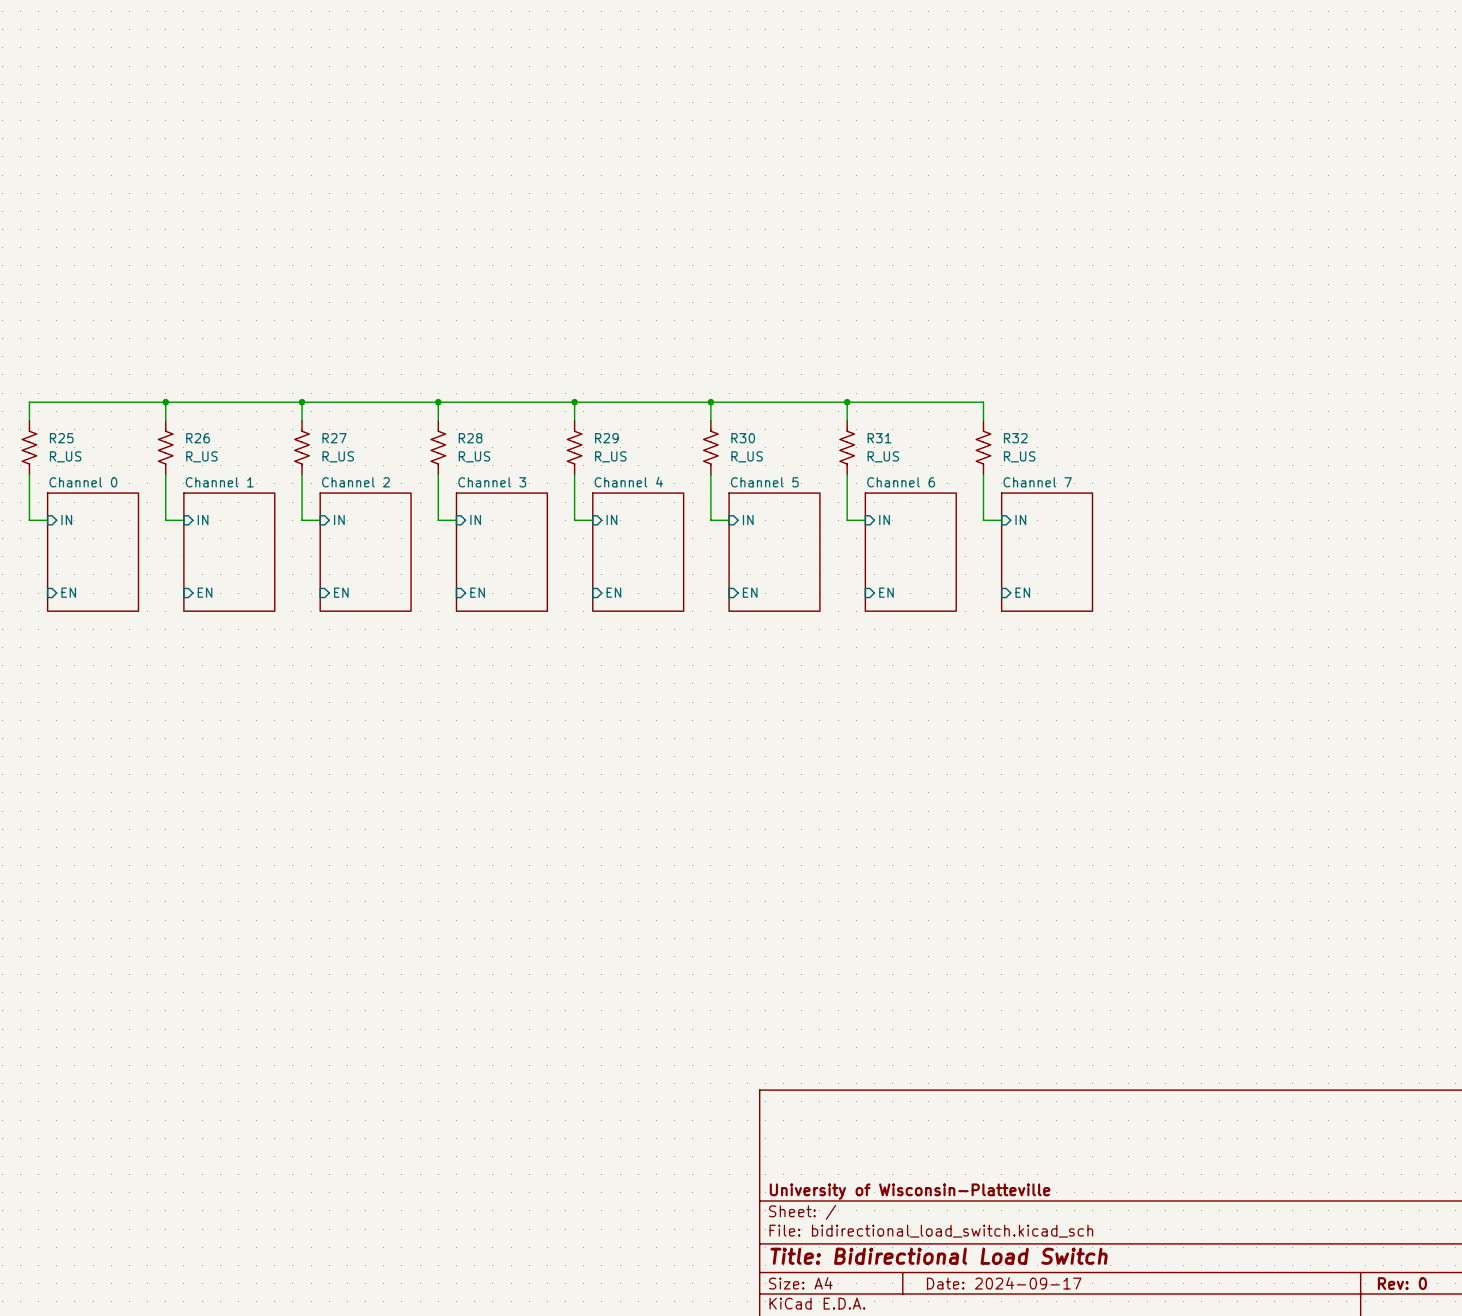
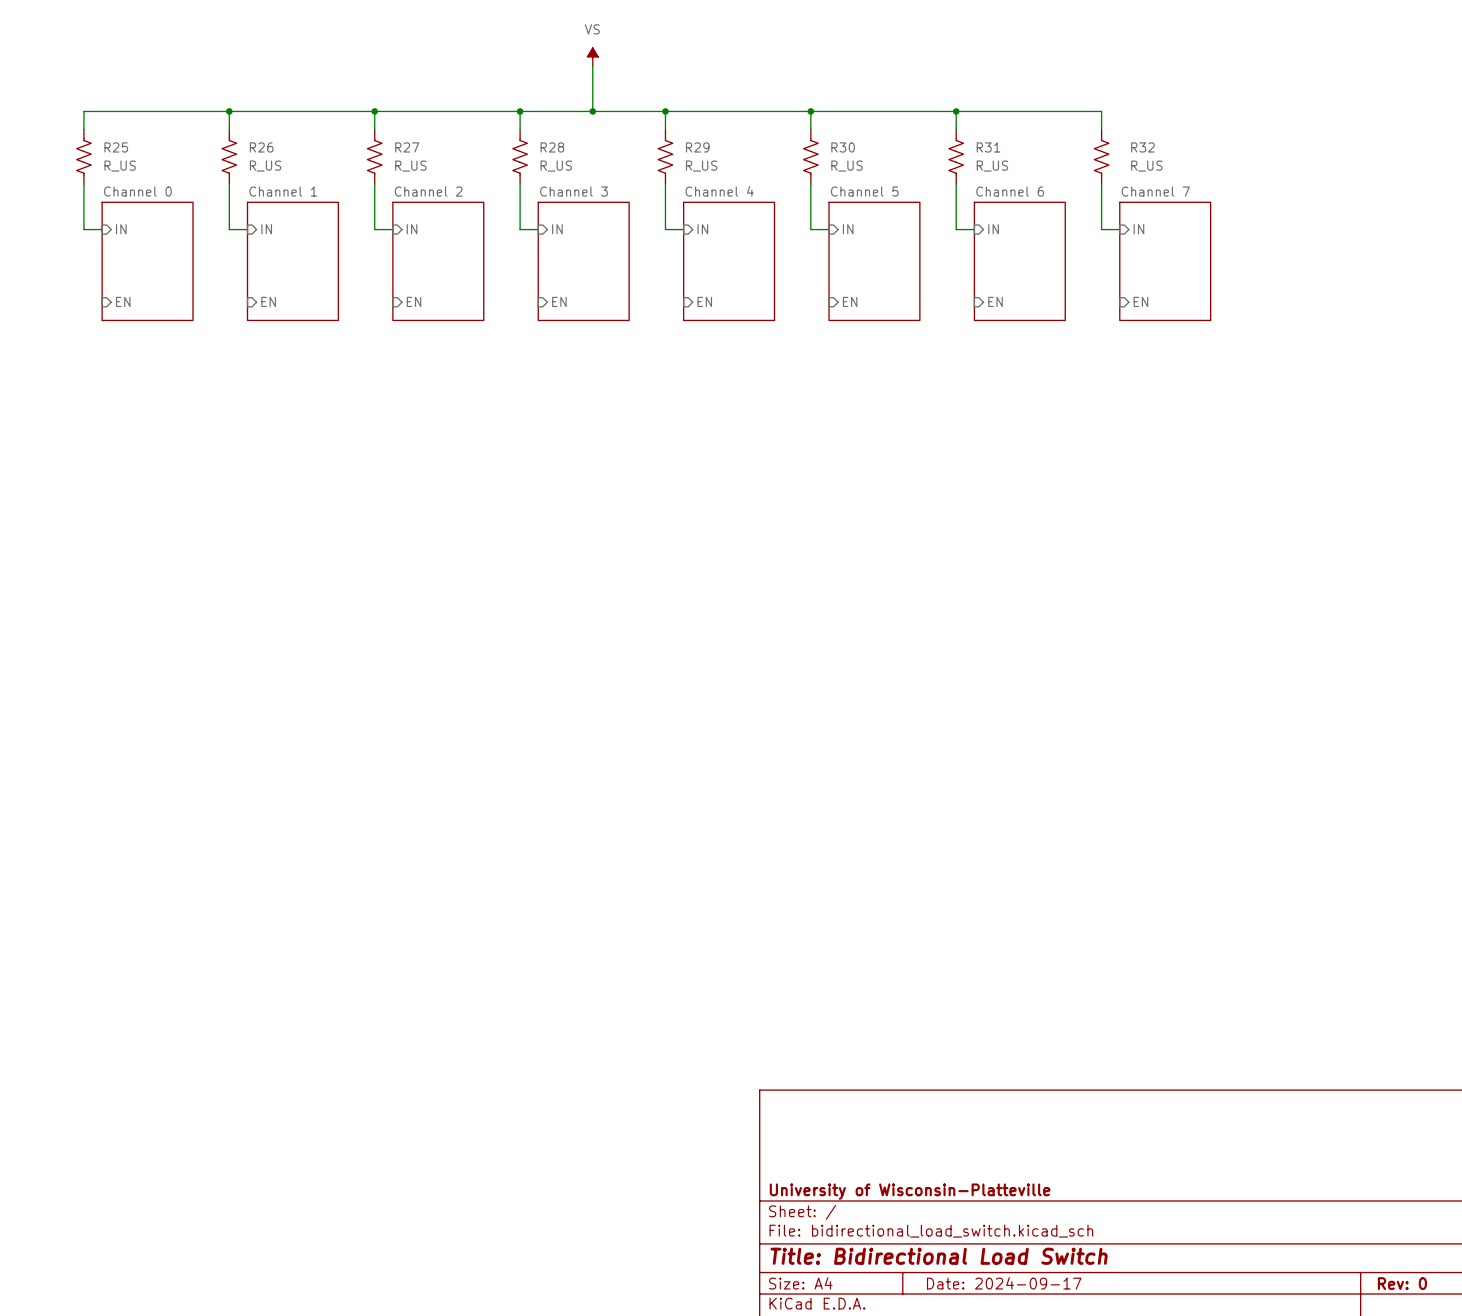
power symbol: none -> VS (592, 56)
wire: none -> (592, 66) (592, 111)
wire: none -> (229, 111) (229, 129)
junction: none -> (229, 111)
wire: none -> (374, 111) (374, 129)
junction: none -> (374, 111)
wire: none -> (520, 111) (520, 129)
junction: none -> (520, 111)
junction: none -> (592, 111)
wire: none -> (665, 111) (665, 129)
junction: none -> (665, 111)
wire: none -> (810, 111) (810, 129)
junction: none -> (810, 111)
wire: none -> (956, 111) (956, 129)
junction: none -> (956, 111)
wire: none -> (83, 129) (83, 111) (1101, 111) (1101, 129)
wire: none -> (83, 184) (83, 229) (102, 229)
wire: none -> (229, 184) (229, 229) (247, 229)
wire: none -> (374, 184) (374, 229) (392, 229)
wire: none -> (520, 184) (520, 229) (538, 229)
wire: none -> (665, 184) (665, 229) (683, 229)
wire: none -> (810, 184) (810, 229) (829, 229)
wire: none -> (956, 184) (956, 229) (974, 229)
wire: none -> (1101, 184) (1101, 229) (1119, 229)
sheet pin: none -> IN (121, 229)
sheet pin: none -> IN (266, 229)
sheet pin: none -> IN (412, 229)
sheet pin: none -> IN (557, 229)
sheet pin: none -> IN (702, 229)
sheet pin: none -> IN (848, 229)
sheet pin: none -> IN (993, 229)
sheet pin: none -> IN (1138, 229)
sheet pin: none -> EN (123, 301)
sheet pin: none -> EN (268, 301)
sheet pin: none -> EN (414, 301)
sheet pin: none -> EN (559, 301)
sheet pin: none -> EN (704, 301)
sheet pin: none -> EN (850, 301)
sheet pin: none -> EN (995, 301)
sheet pin: none -> EN (1140, 301)
wire: (165, 402) (165, 420) -> none
junction: (165, 402) -> none
wire: (302, 402) (302, 420) -> none
junction: (302, 402) -> none
wire: (438, 402) (438, 420) -> none
junction: (438, 402) -> none
wire: (574, 402) (574, 420) -> none
junction: (574, 402) -> none
wire: (710, 402) (710, 420) -> none
junction: (710, 402) -> none
wire: (847, 402) (847, 420) -> none
junction: (847, 402) -> none
wire: (29, 420) (29, 402) (983, 402) (983, 420) -> none
R32 name position: R32 (1015, 438) -> R32 (1142, 147)
R25 position: (29, 447) -> (83, 156)
R26 position: (165, 447) -> (229, 156)
R27 position: (302, 447) -> (374, 156)
R28 position: (438, 447) -> (520, 156)
R29 position: (574, 447) -> (665, 156)
R30 position: (710, 447) -> (810, 156)
R31 position: (847, 447) -> (956, 156)
R32 position: (983, 447) -> (1101, 156)
R32 value position: R_US (1019, 456) -> R_US (1146, 166)
wire: (29, 474) (29, 520) (47, 520) -> none
wire: (165, 474) (165, 520) (183, 520) -> none
wire: (302, 474) (302, 520) (320, 520) -> none
wire: (438, 474) (438, 520) (456, 520) -> none
wire: (574, 474) (574, 520) (592, 520) -> none
wire: (710, 474) (710, 520) (729, 520) -> none
wire: (847, 474) (847, 520) (865, 520) -> none
wire: (983, 474) (983, 520) (1001, 520) -> none
sheet pin: IN (66, 519) -> none
sheet pin: IN (203, 519) -> none
sheet pin: IN (339, 519) -> none
sheet pin: IN (475, 519) -> none
sheet pin: IN (611, 519) -> none
sheet pin: IN (748, 519) -> none
sheet pin: IN (884, 519) -> none
sheet pin: IN (1020, 519) -> none
sheet Channel 0 position: (93, 552) -> (147, 261)
sheet Channel 1 position: (229, 552) -> (292, 261)
sheet Channel 2 position: (365, 552) -> (438, 261)
sheet Channel 3 position: (501, 552) -> (583, 261)
sheet Channel 4 position: (638, 552) -> (729, 261)
sheet Channel 5 position: (774, 552) -> (874, 261)
sheet Channel 6 position: (910, 552) -> (1019, 261)
sheet Channel 7 position: (1047, 552) -> (1165, 261)
sheet pin: EN (68, 592) -> none
sheet pin: EN (205, 592) -> none
sheet pin: EN (341, 592) -> none
sheet pin: EN (477, 592) -> none
sheet pin: EN (613, 592) -> none
sheet pin: EN (750, 592) -> none
sheet pin: EN (886, 592) -> none
sheet pin: EN (1022, 592) -> none

